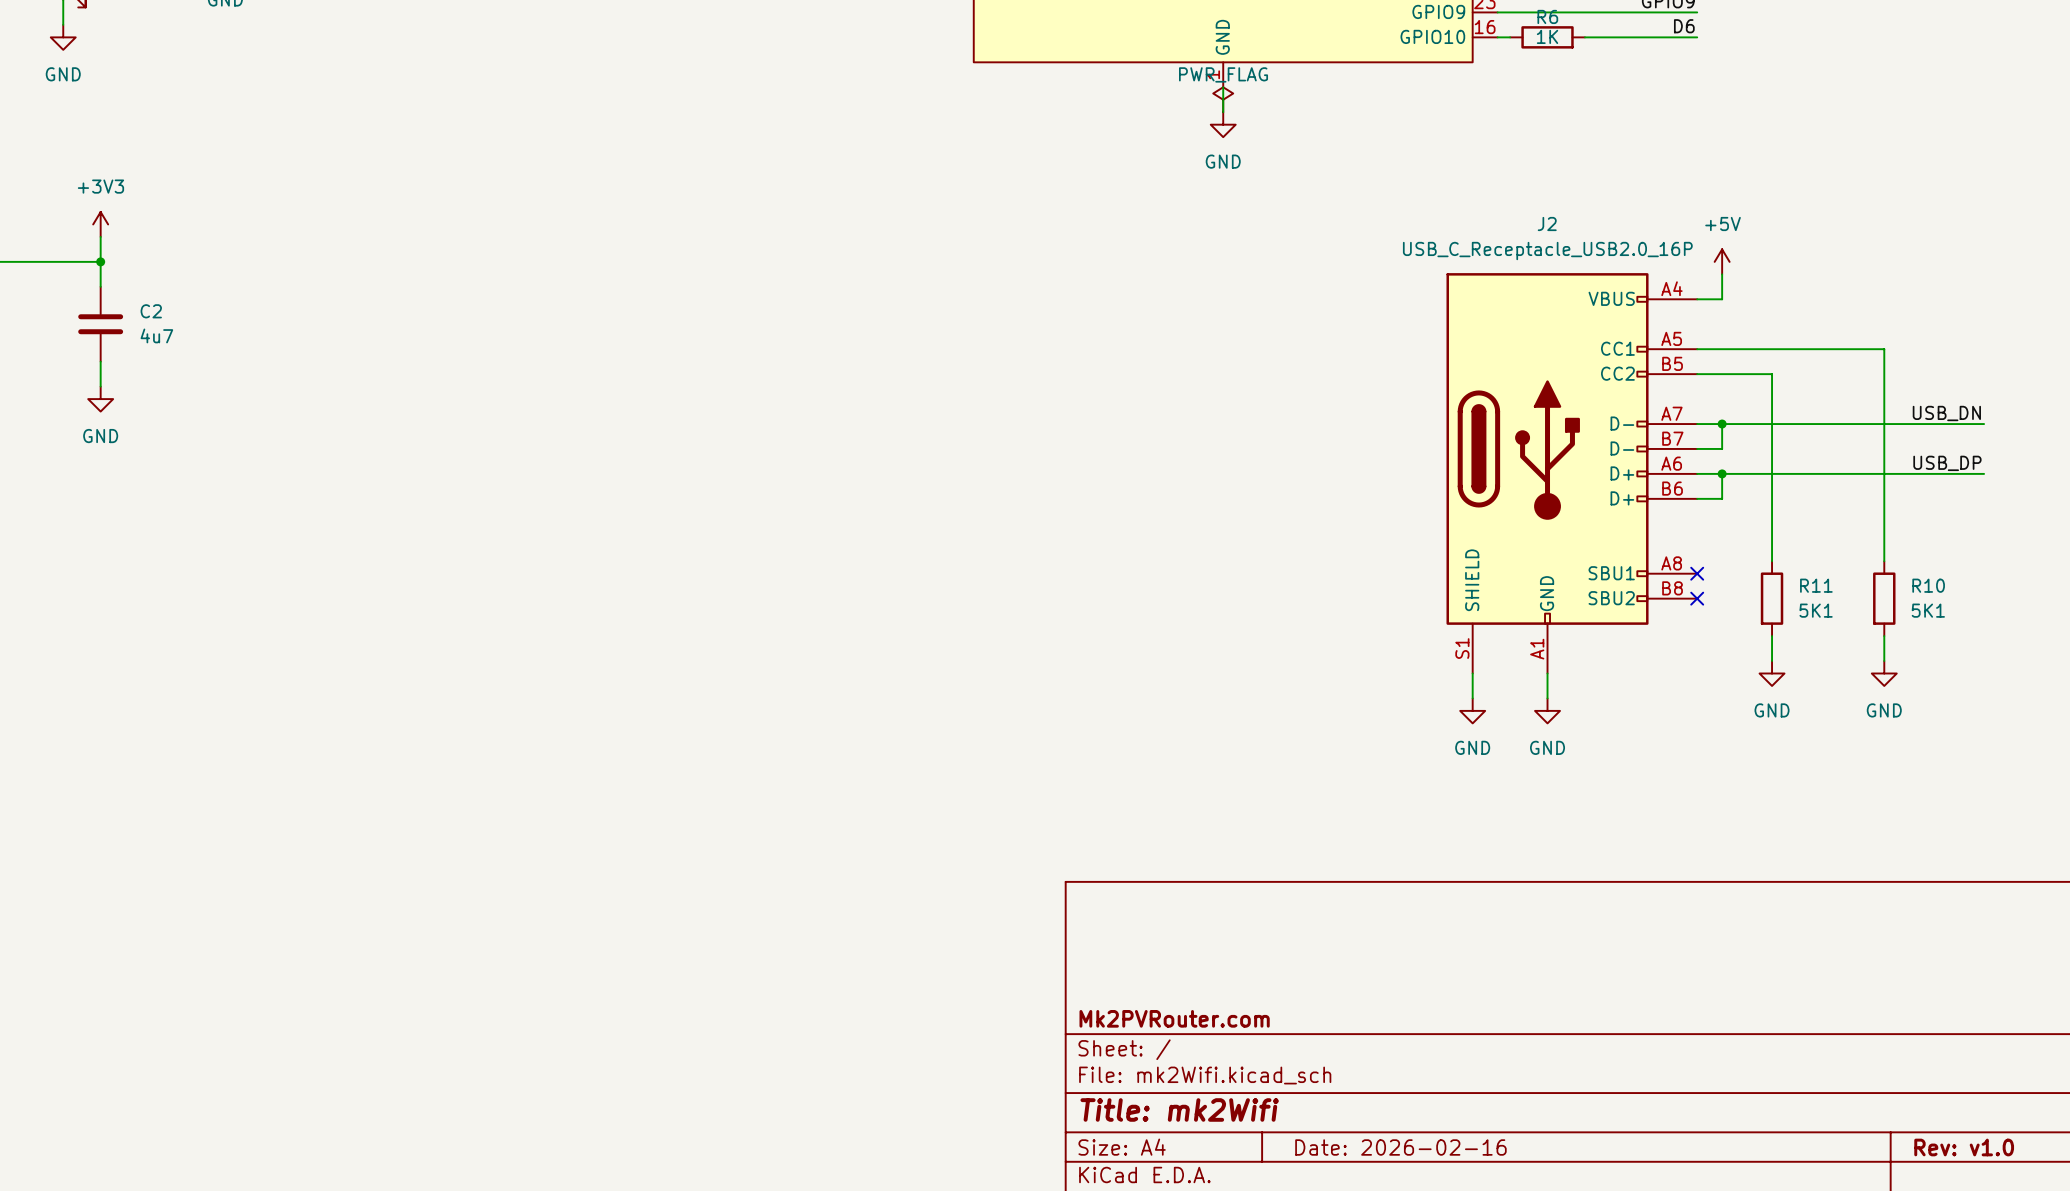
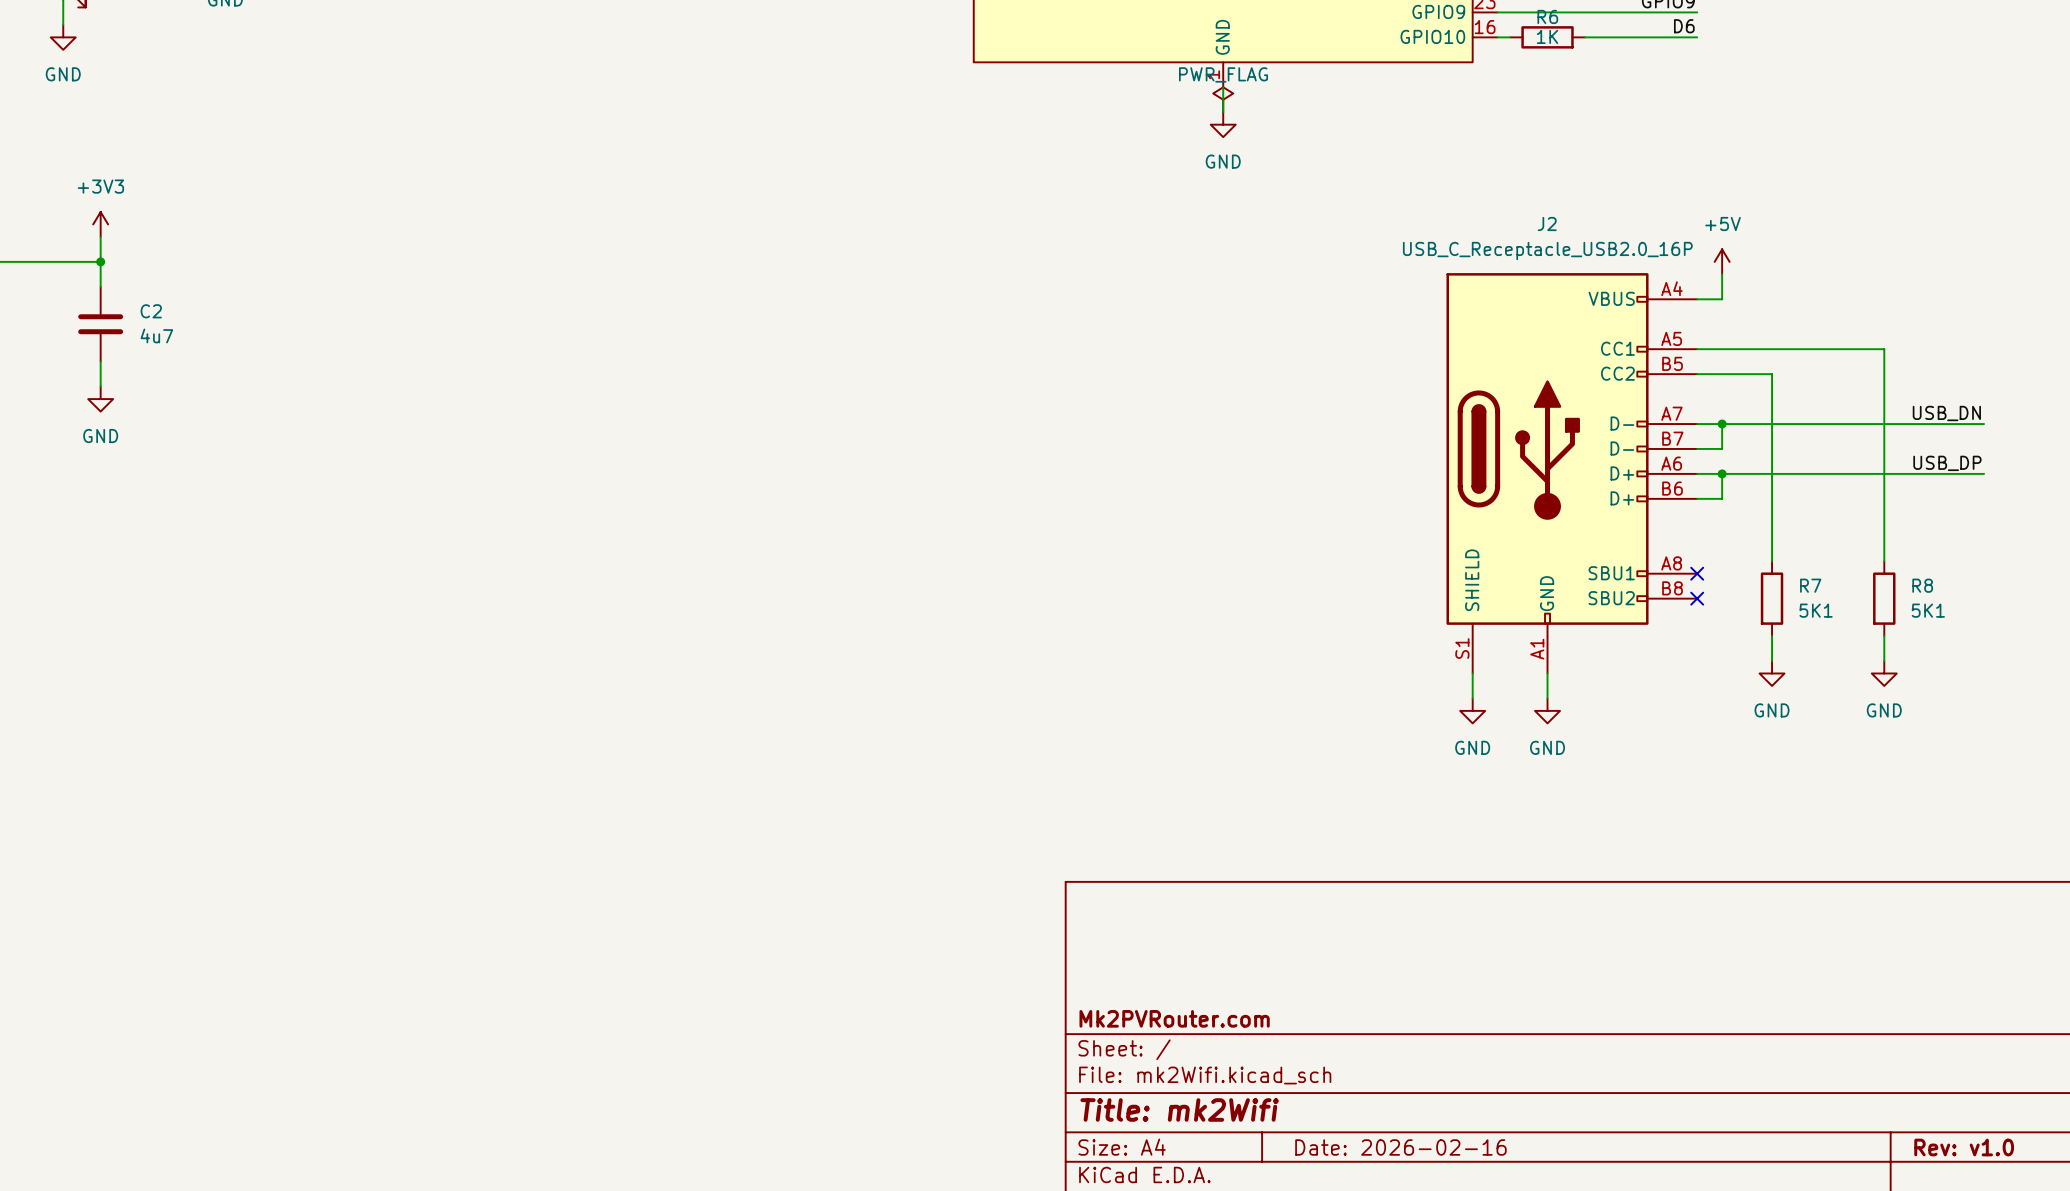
R11 name: R11 (1816, 585) -> R7 (1810, 585)
R10 name: R10 (1928, 585) -> R8 (1922, 585)

